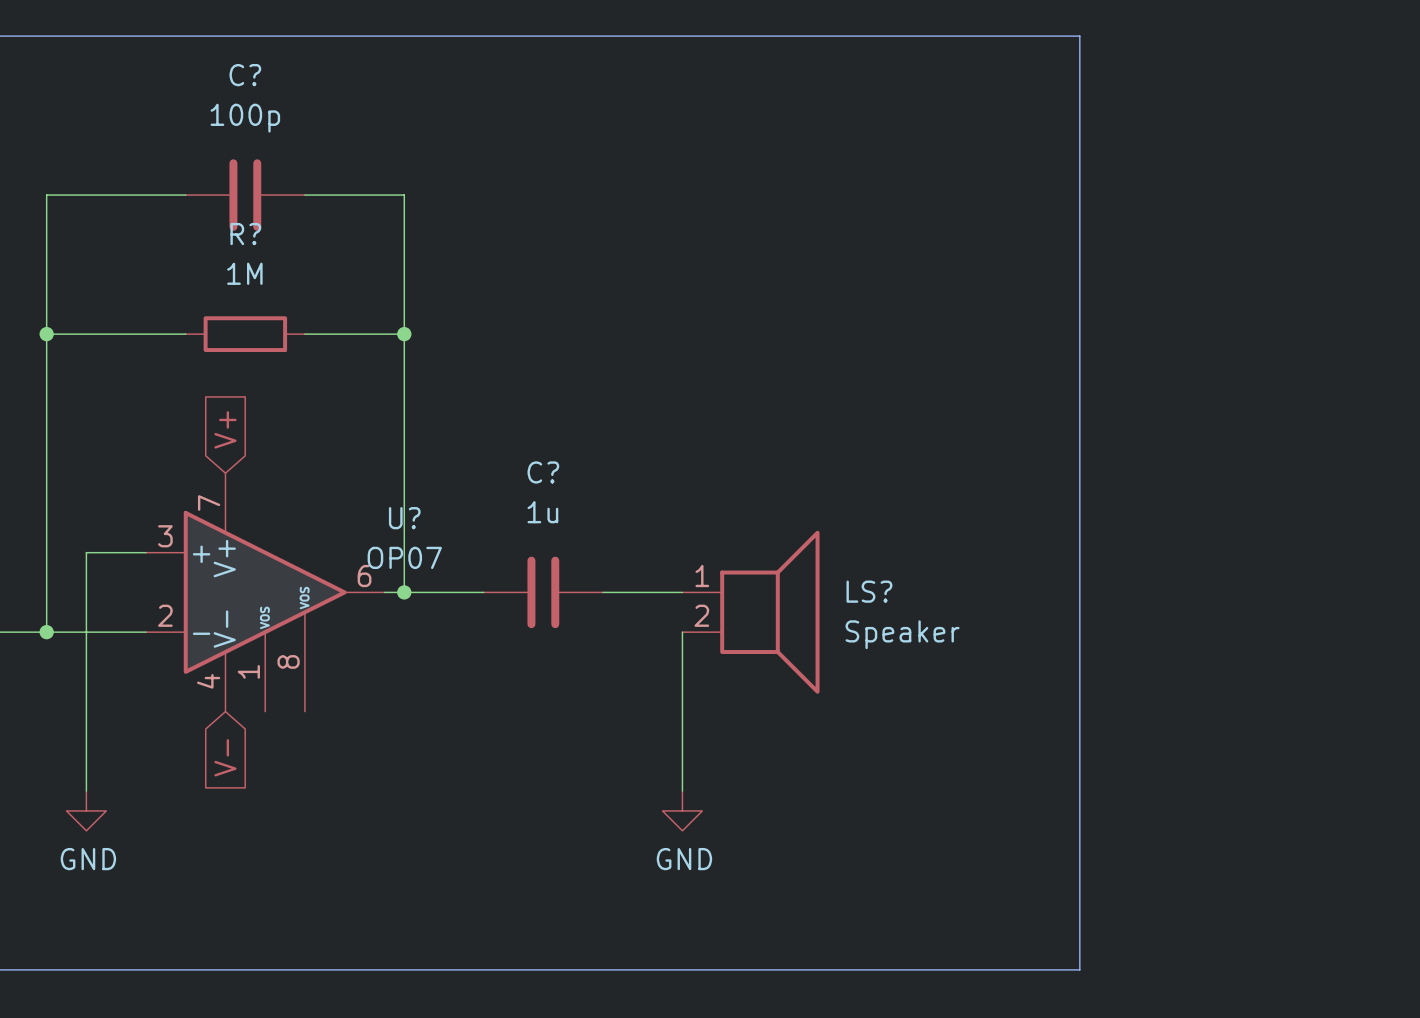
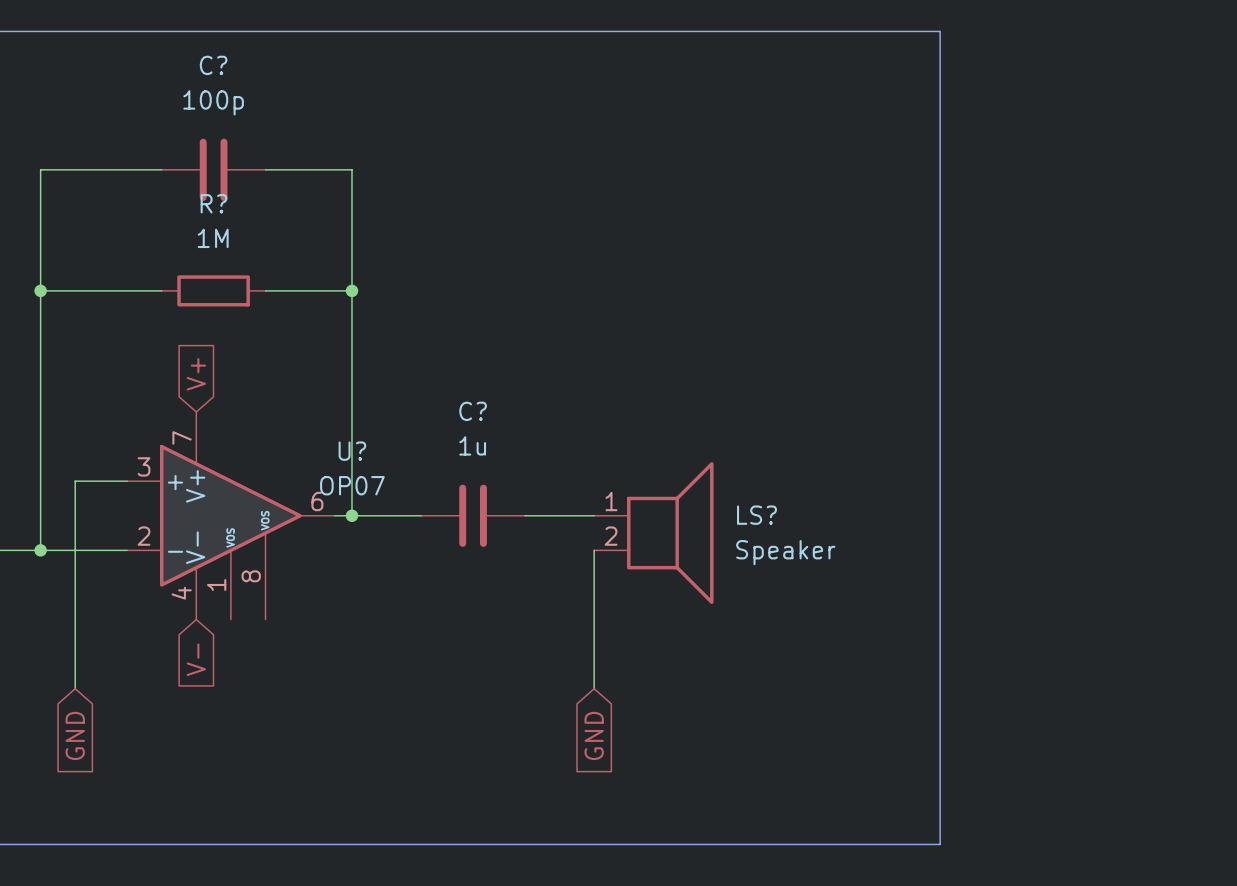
power symbol: GND (86, 810) -> none
power symbol: GND (682, 810) -> none
global label: none -> GND (75, 735)
global label: none -> GND (594, 735)

